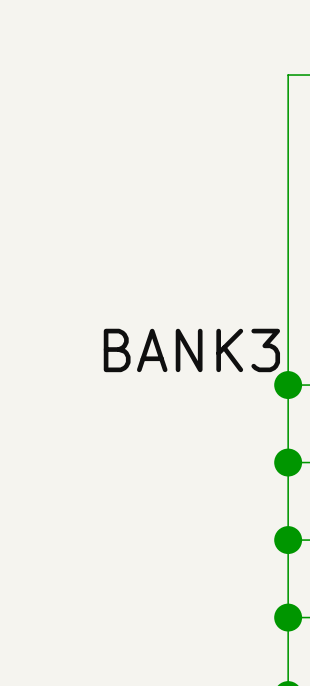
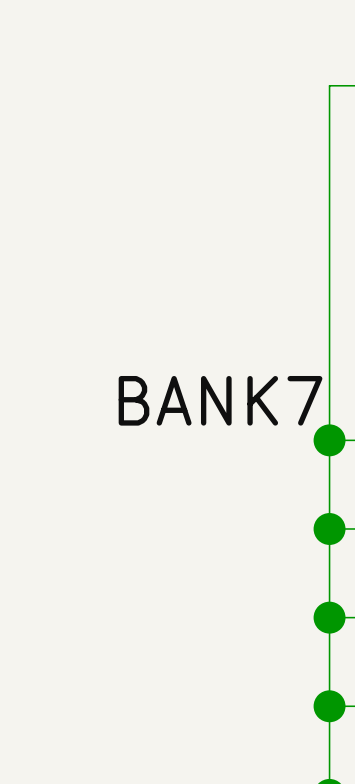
label: BANK3 (191, 350) -> BANK7 (220, 400)

